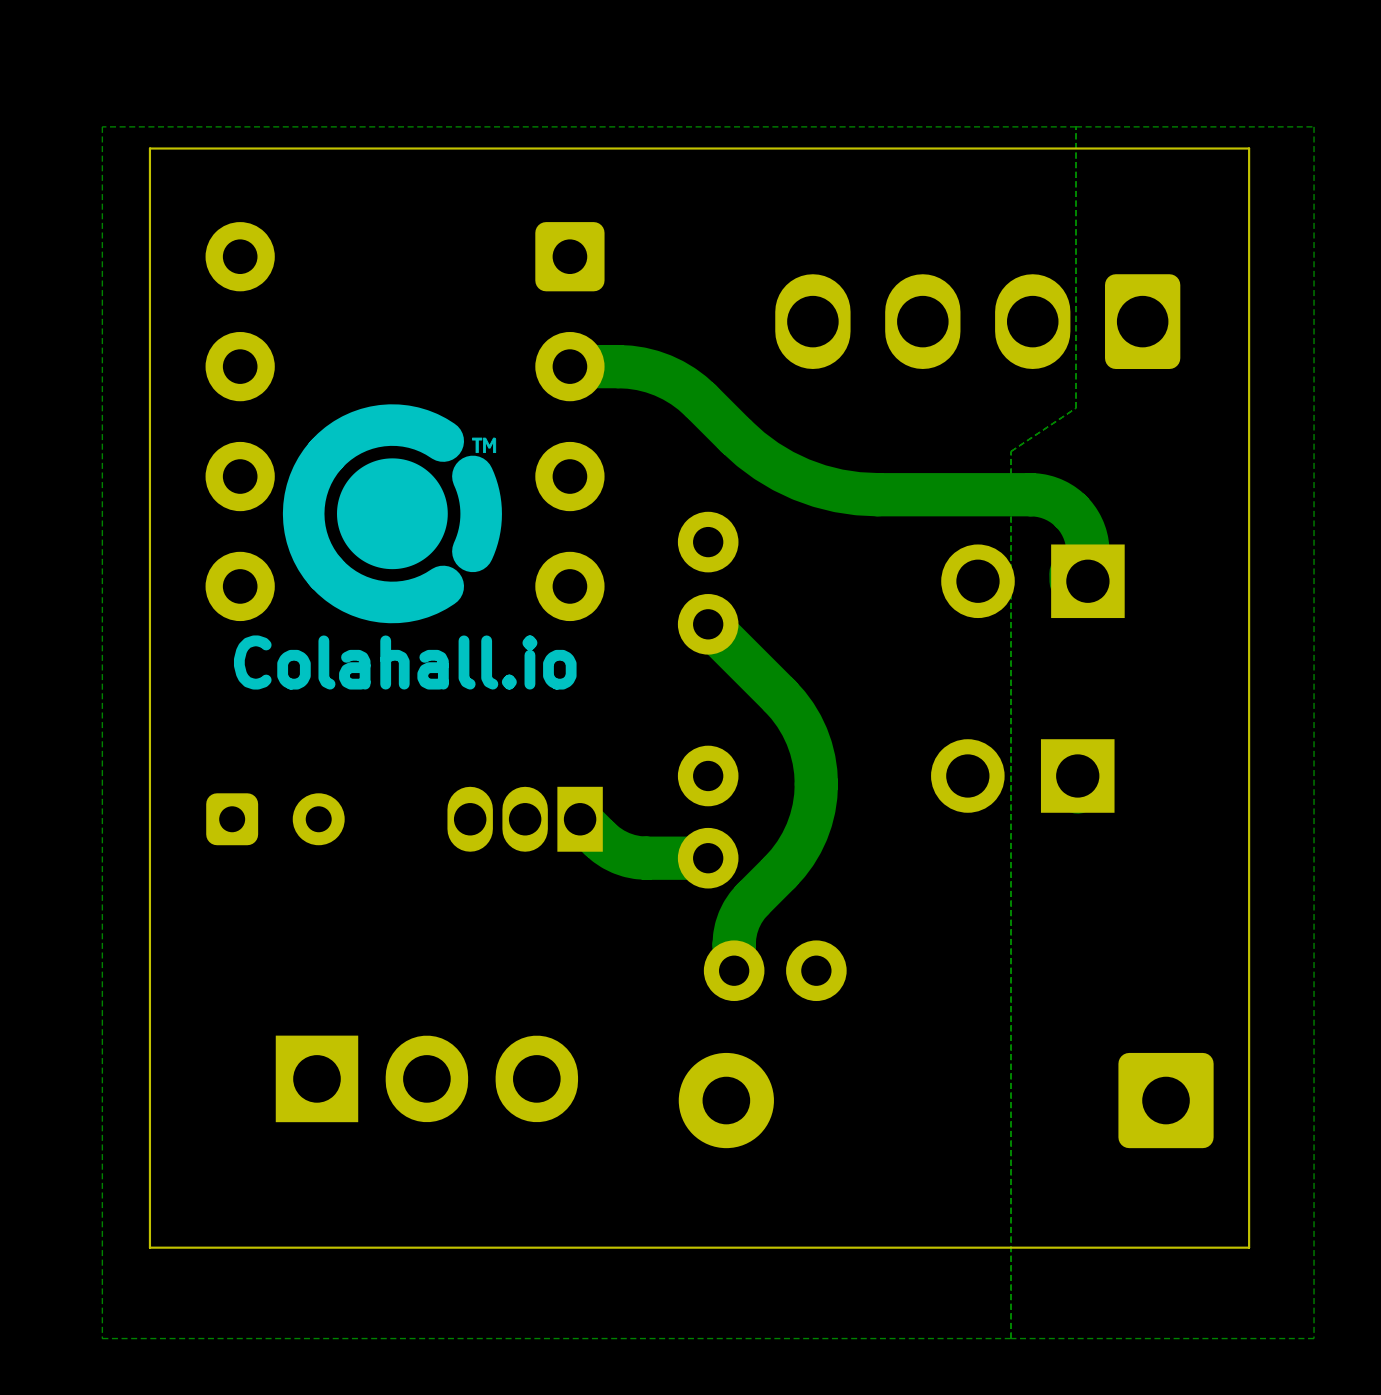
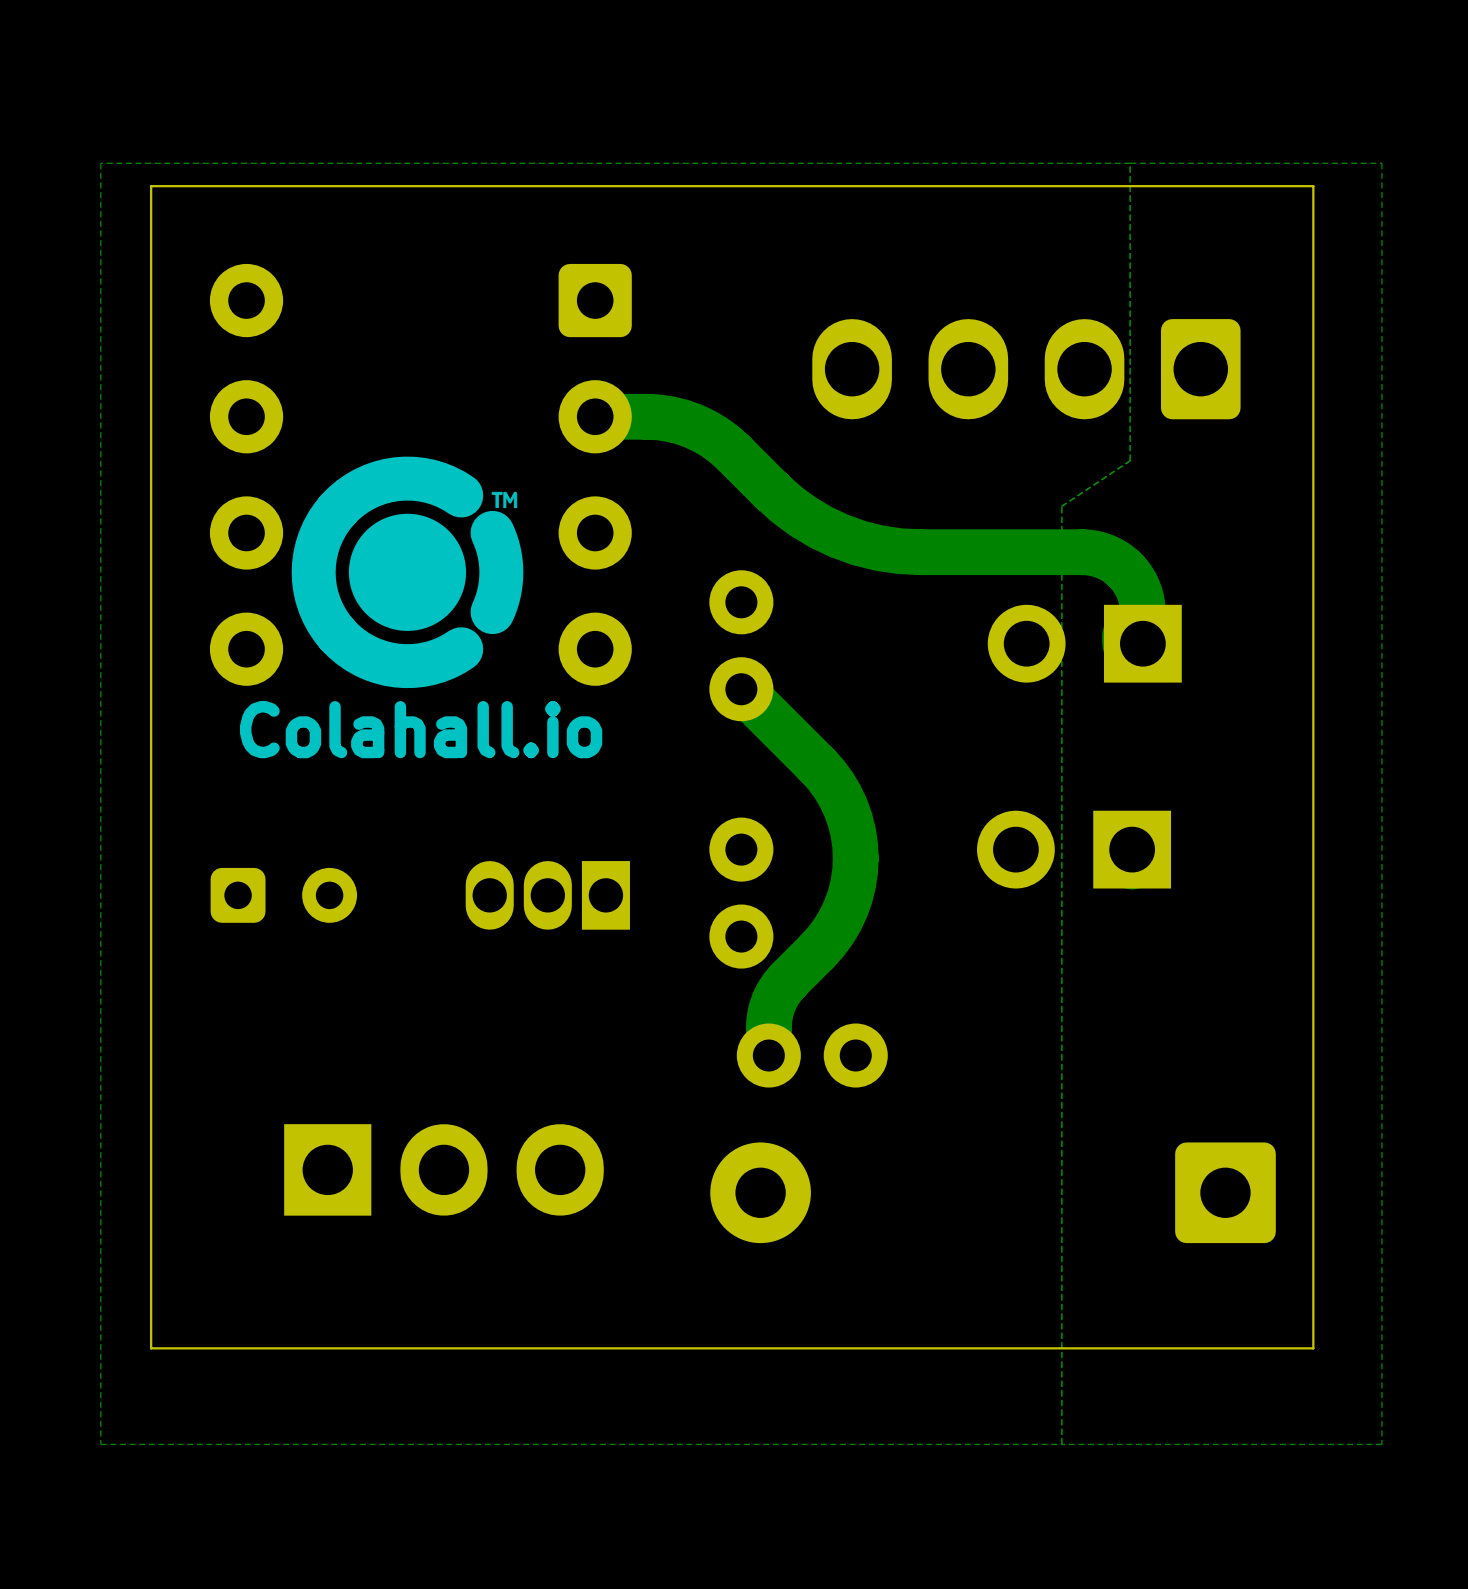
track: (580, 819) (606, 844) (629, 855) (646, 858) (708, 858) -> none

